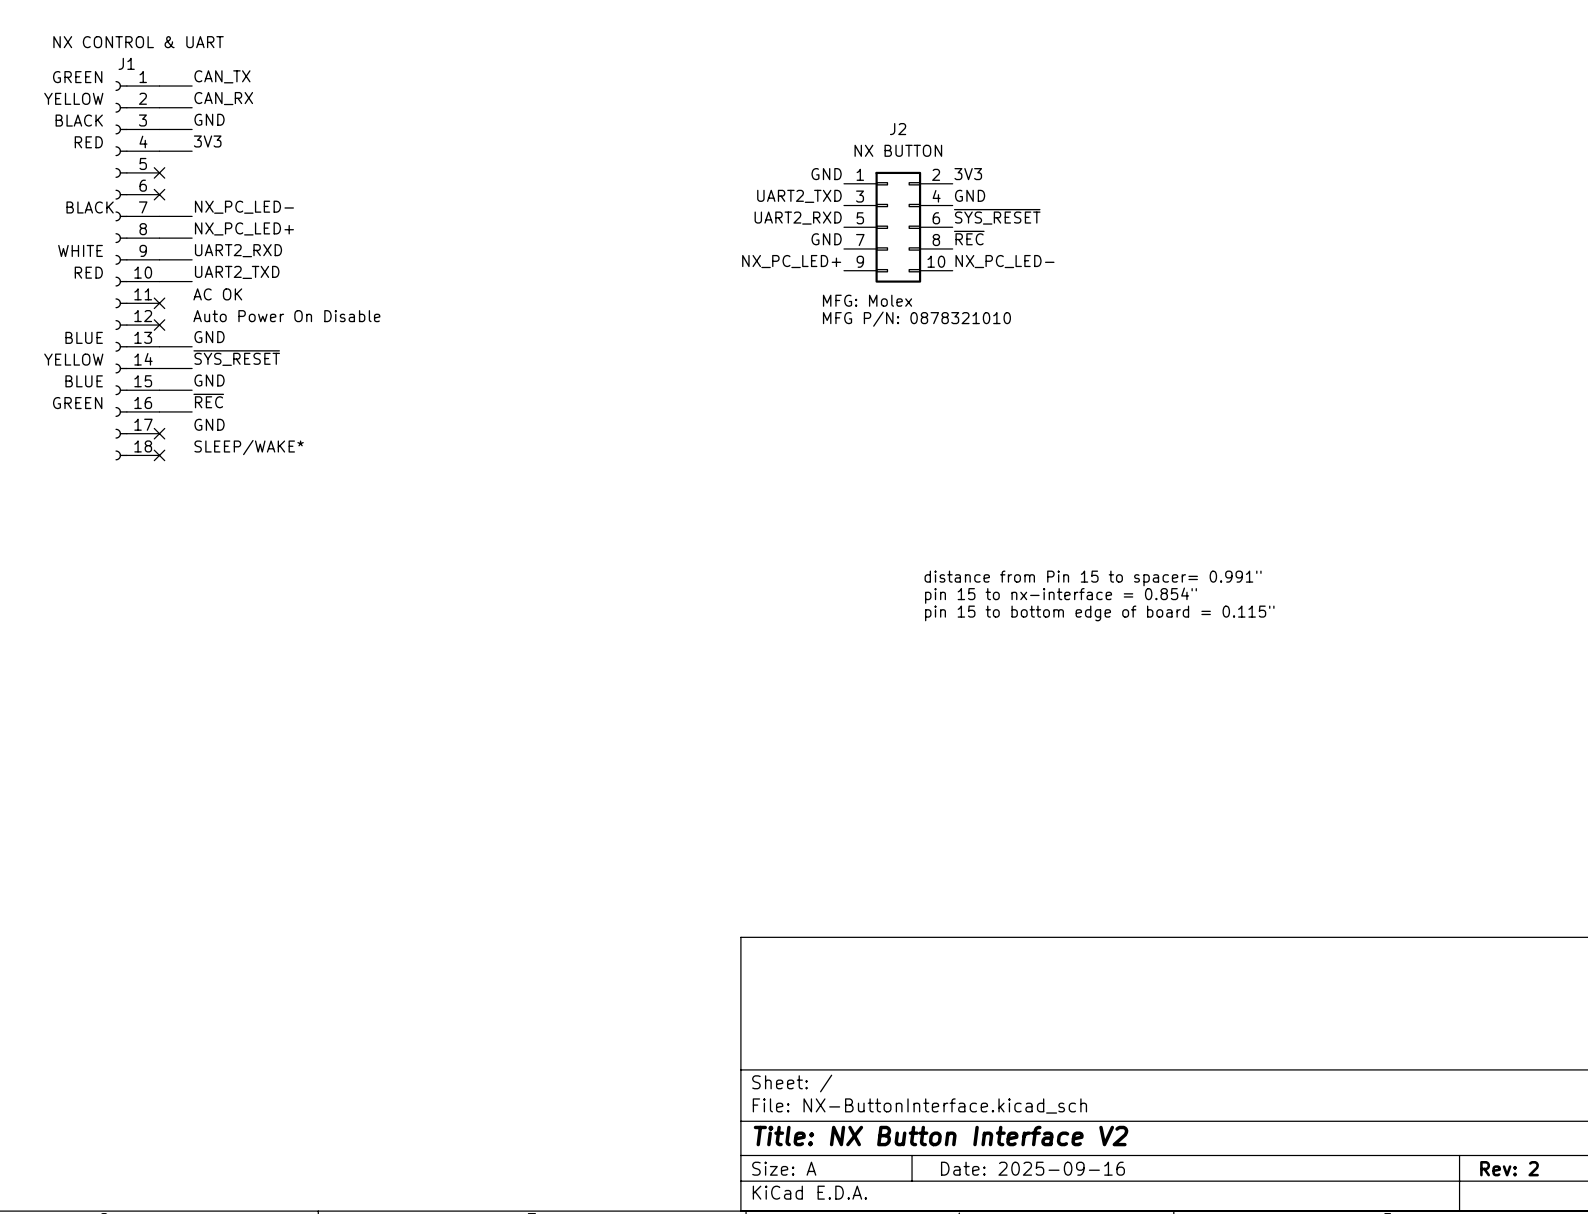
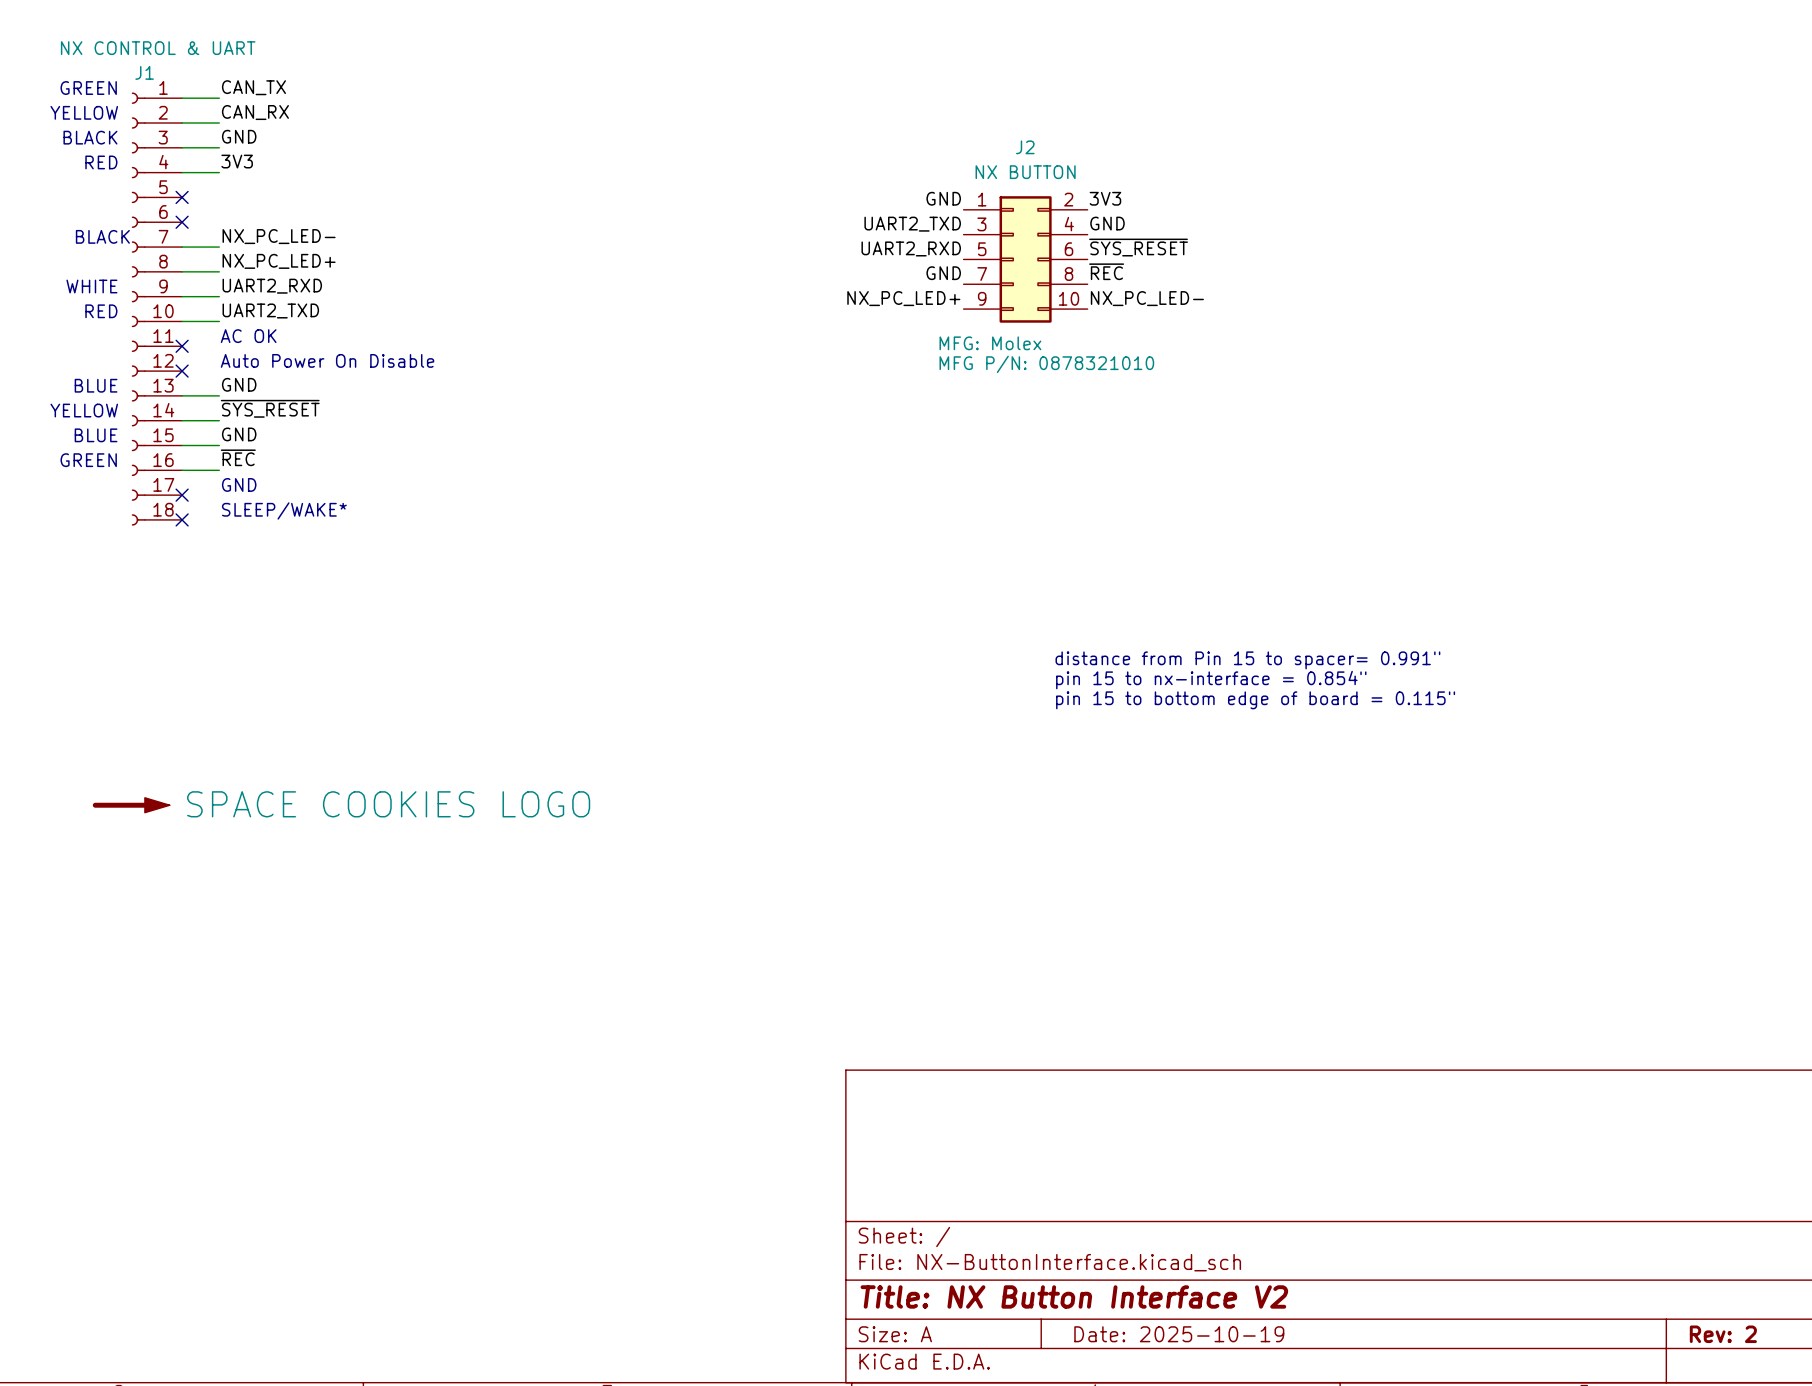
part: none -> SPACE COOKIES LOGO (131, 805)
title block: Date: 2025-09-16 (1032, 1168) -> Date: 2025-10-19 (1179, 1334)

